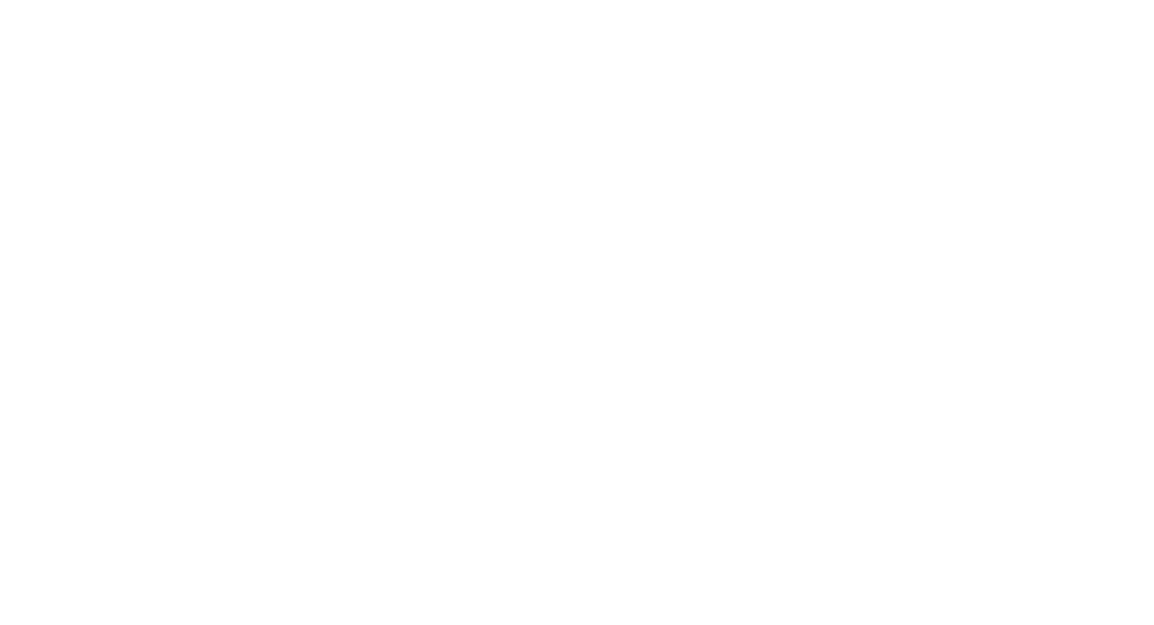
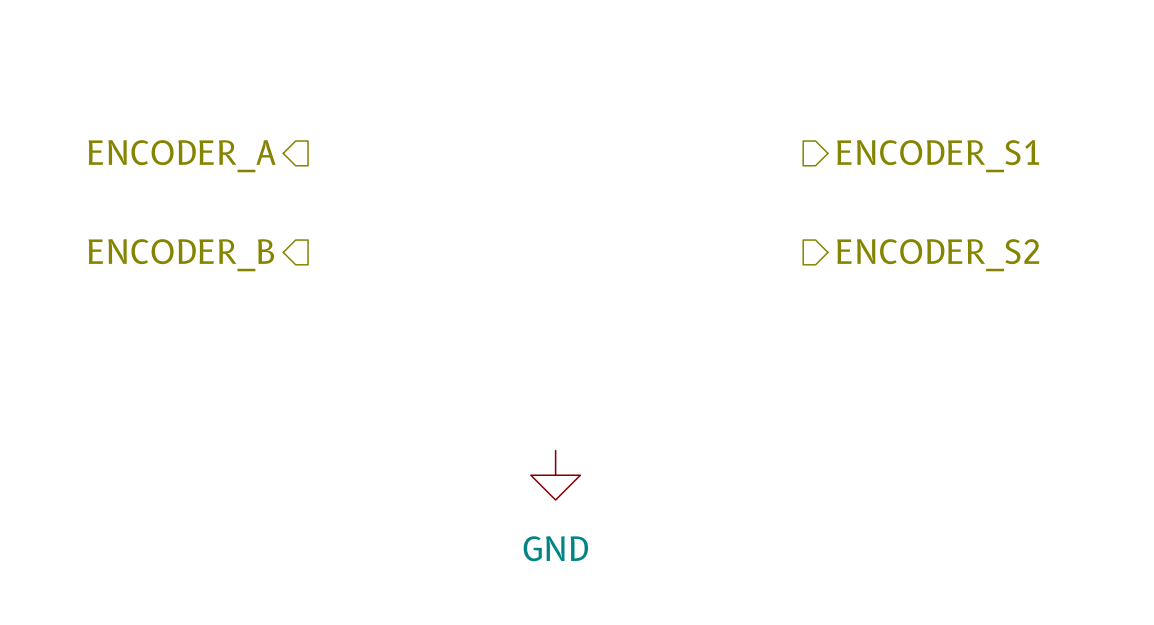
hierarchical label: none -> ENCODER_A (182, 156)
hierarchical label: none -> ENCODER_S1 (938, 156)
hierarchical label: none -> ENCODER_B (181, 255)
hierarchical label: none -> ENCODER_S2 (938, 255)
power symbol: none -> GND (555, 475)

